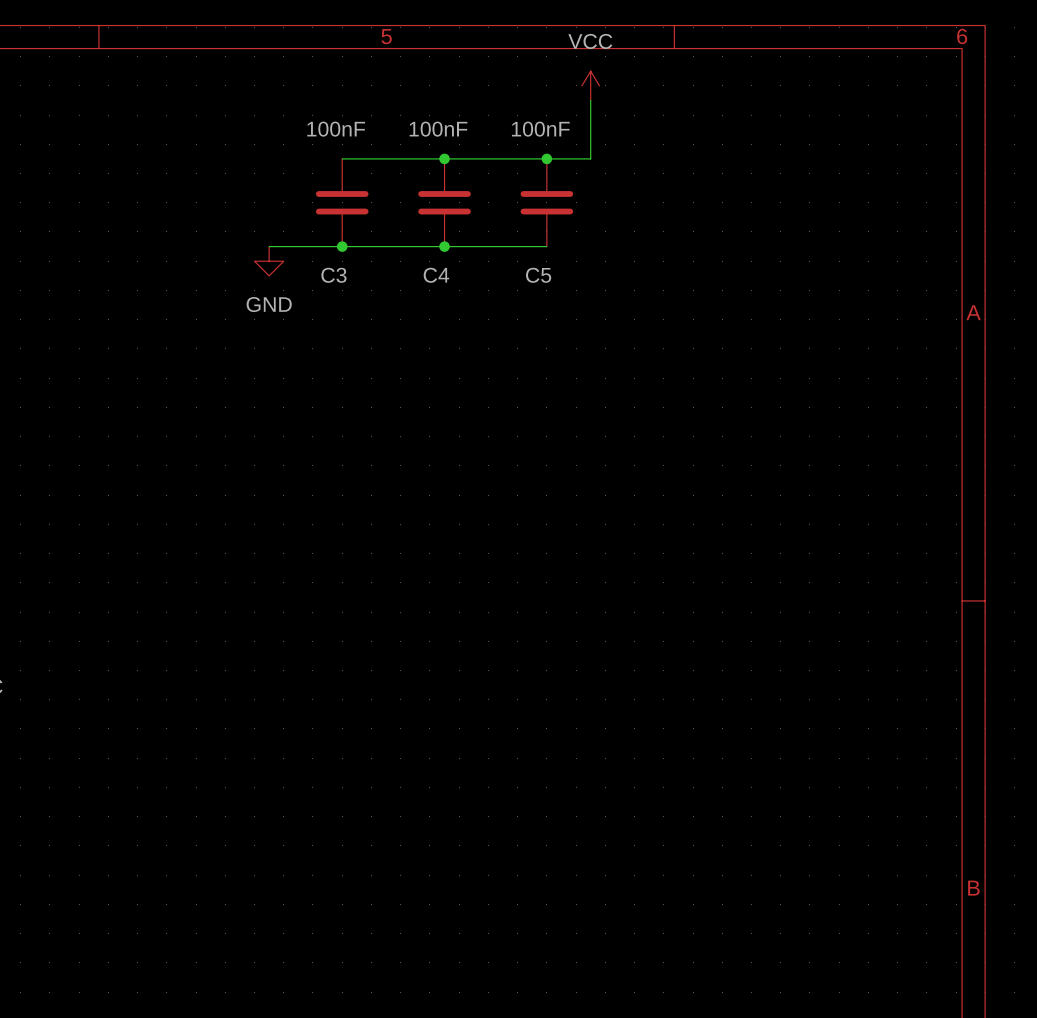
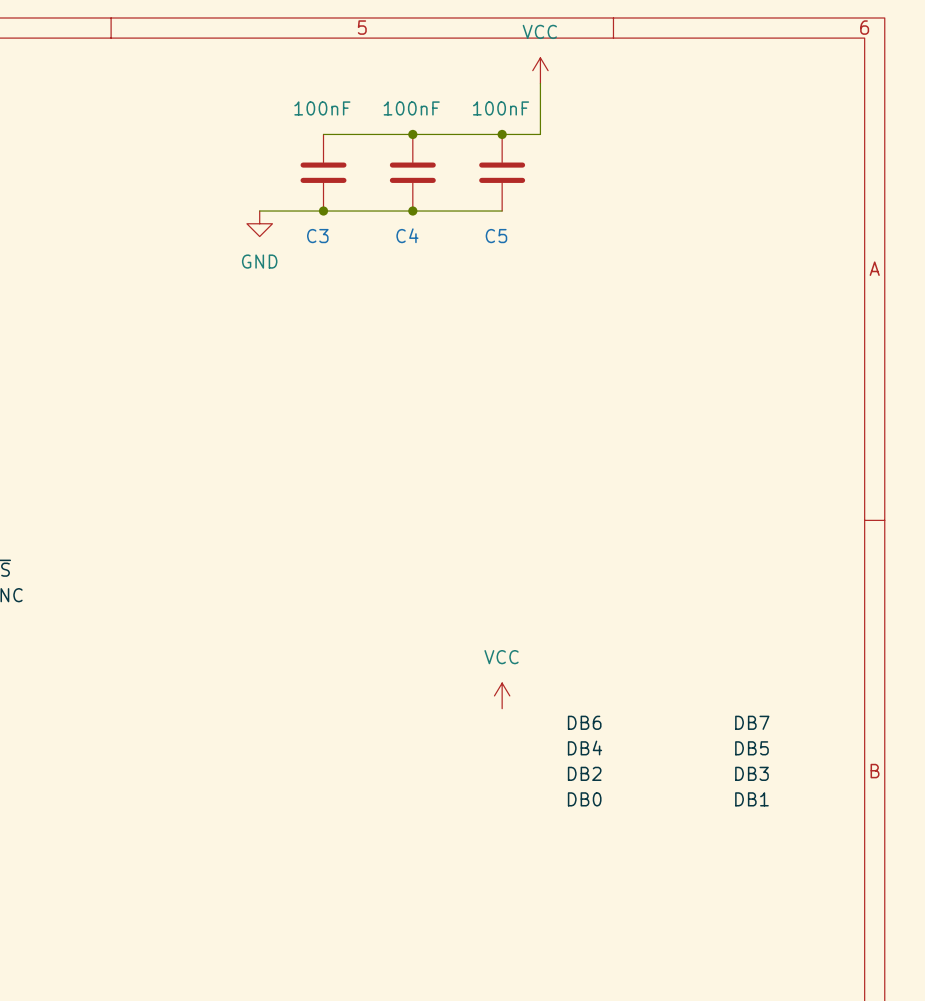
power symbol: none -> VCC (502, 695)
label: none -> DB6 (584, 722)
label: none -> DB7 (752, 722)
label: none -> DB4 (584, 748)
label: none -> DB5 (751, 748)
label: none -> DB2 (584, 773)
label: none -> DB3 (751, 773)
label: none -> DB0 (584, 799)
label: none -> DB1 (751, 799)

